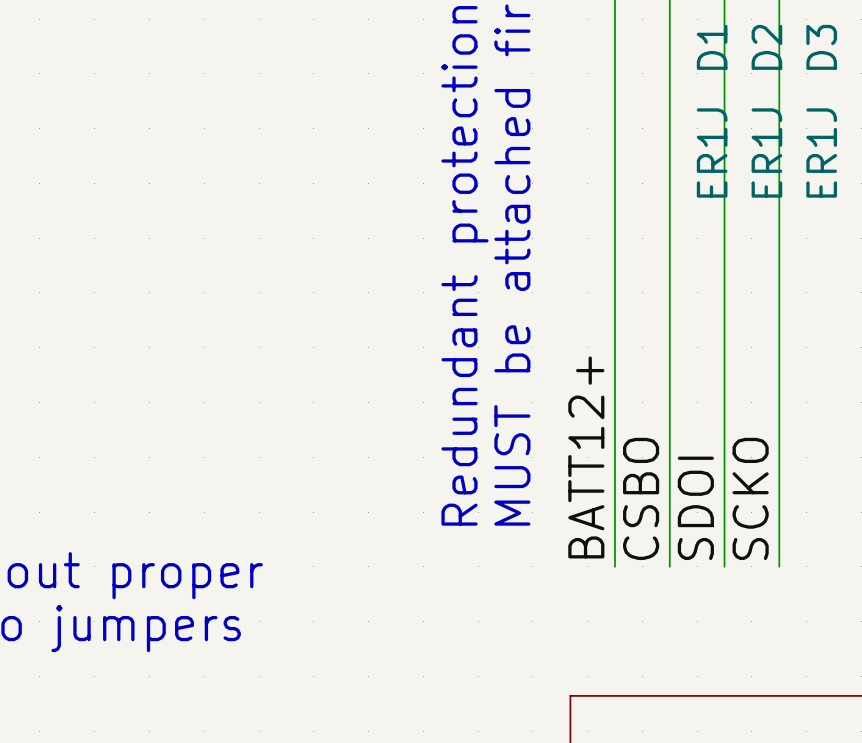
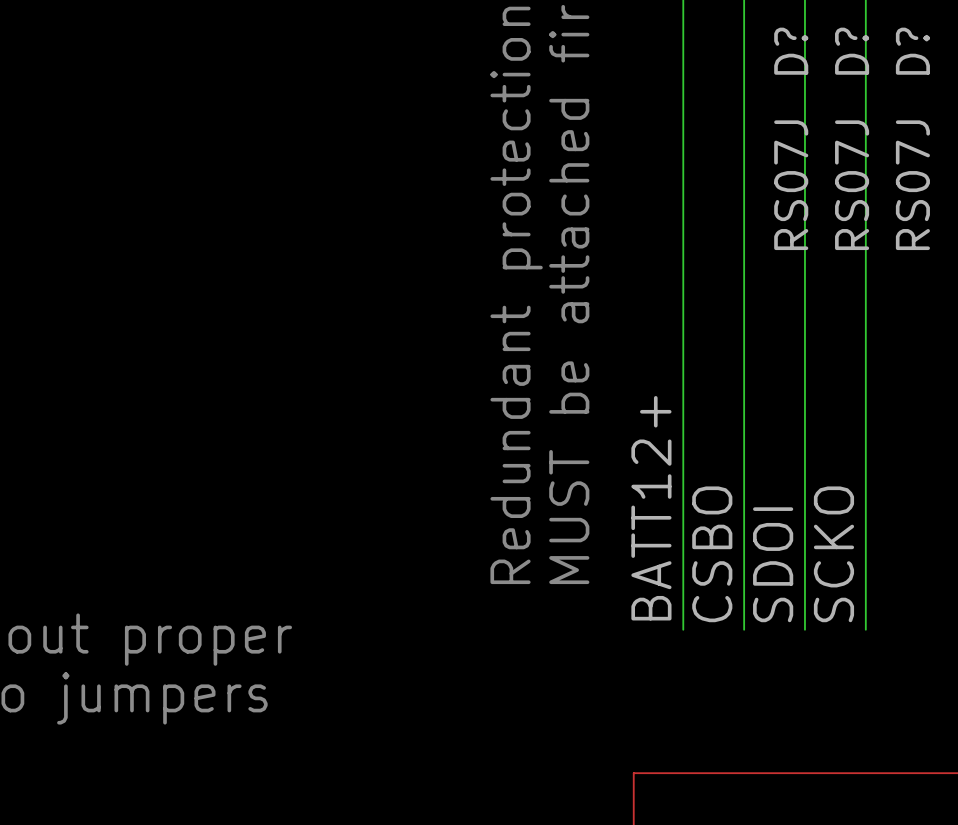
D1 name: D1 (712, 47) -> D? (791, 51)
D2 name: D2 (766, 47) -> D? (852, 51)
D3 name: D3 (821, 47) -> D? (912, 51)
D1 value: ER1J (712, 153) -> RS07J (791, 185)
D2 value: ER1J (766, 153) -> RS07J (852, 185)
D3 value: ER1J (821, 153) -> RS07J (912, 185)

